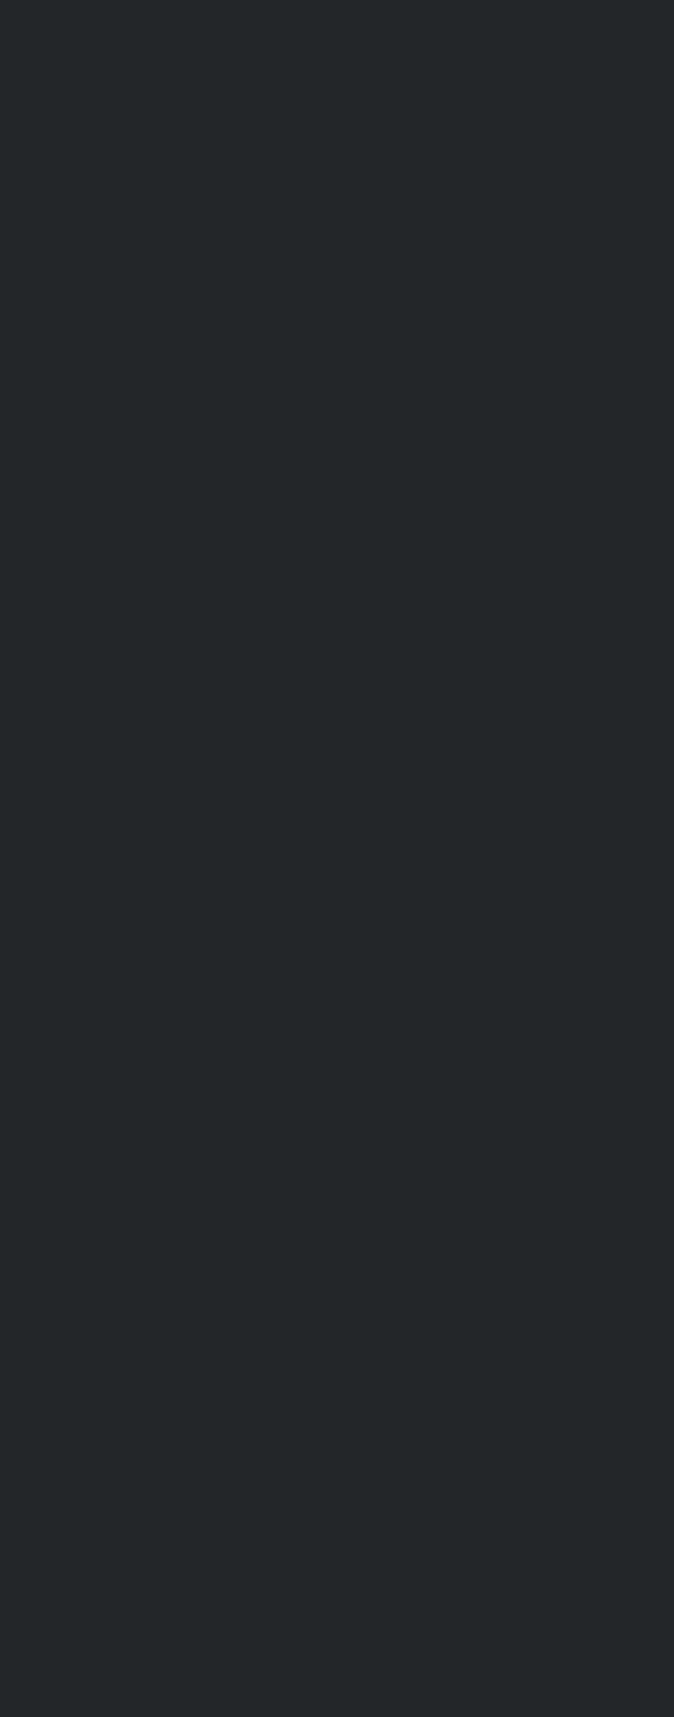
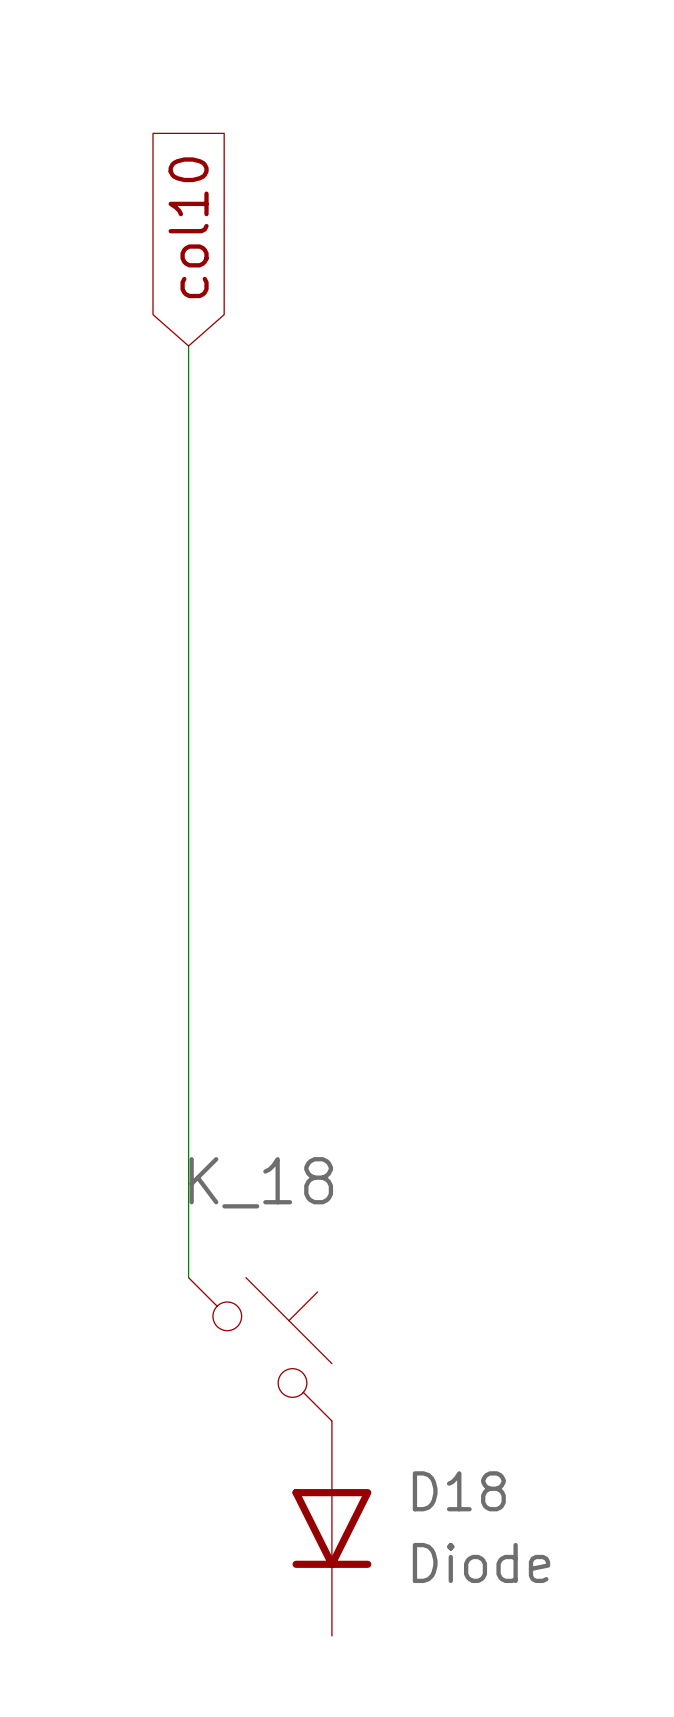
global label: none -> col10 (188, 227)
wire: none -> (188, 345) (188, 1277)
K_18: none -> (260, 1349)
D18: none -> Diode (331, 1528)

